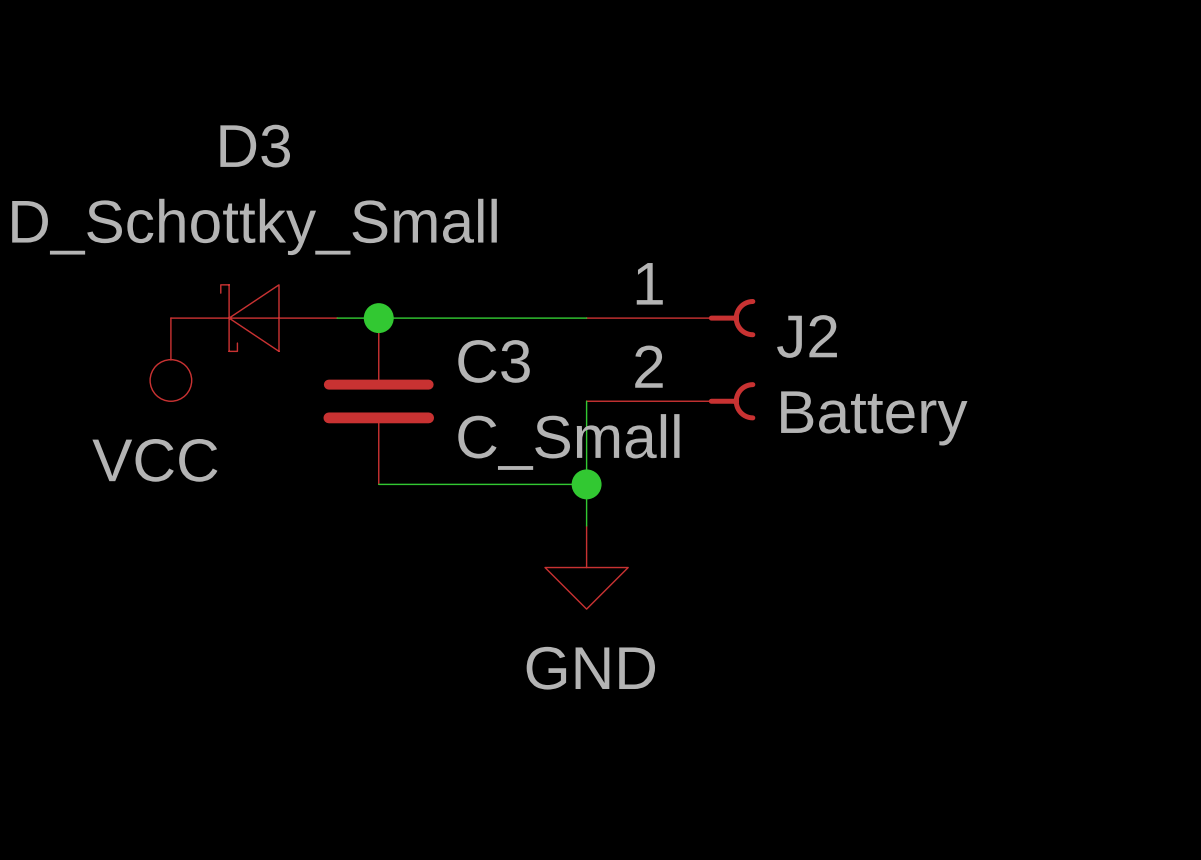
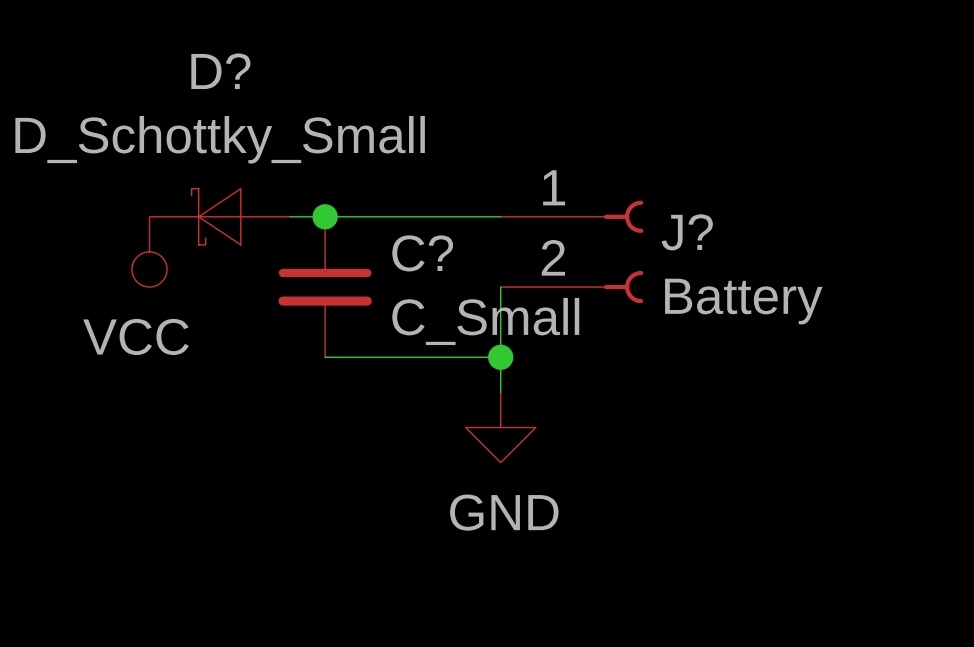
D3 name: D3 (255, 146) -> D? (220, 71)
J2 name: J2 (807, 336) -> J? (687, 232)
C3 name: C3 (494, 361) -> C? (422, 253)

